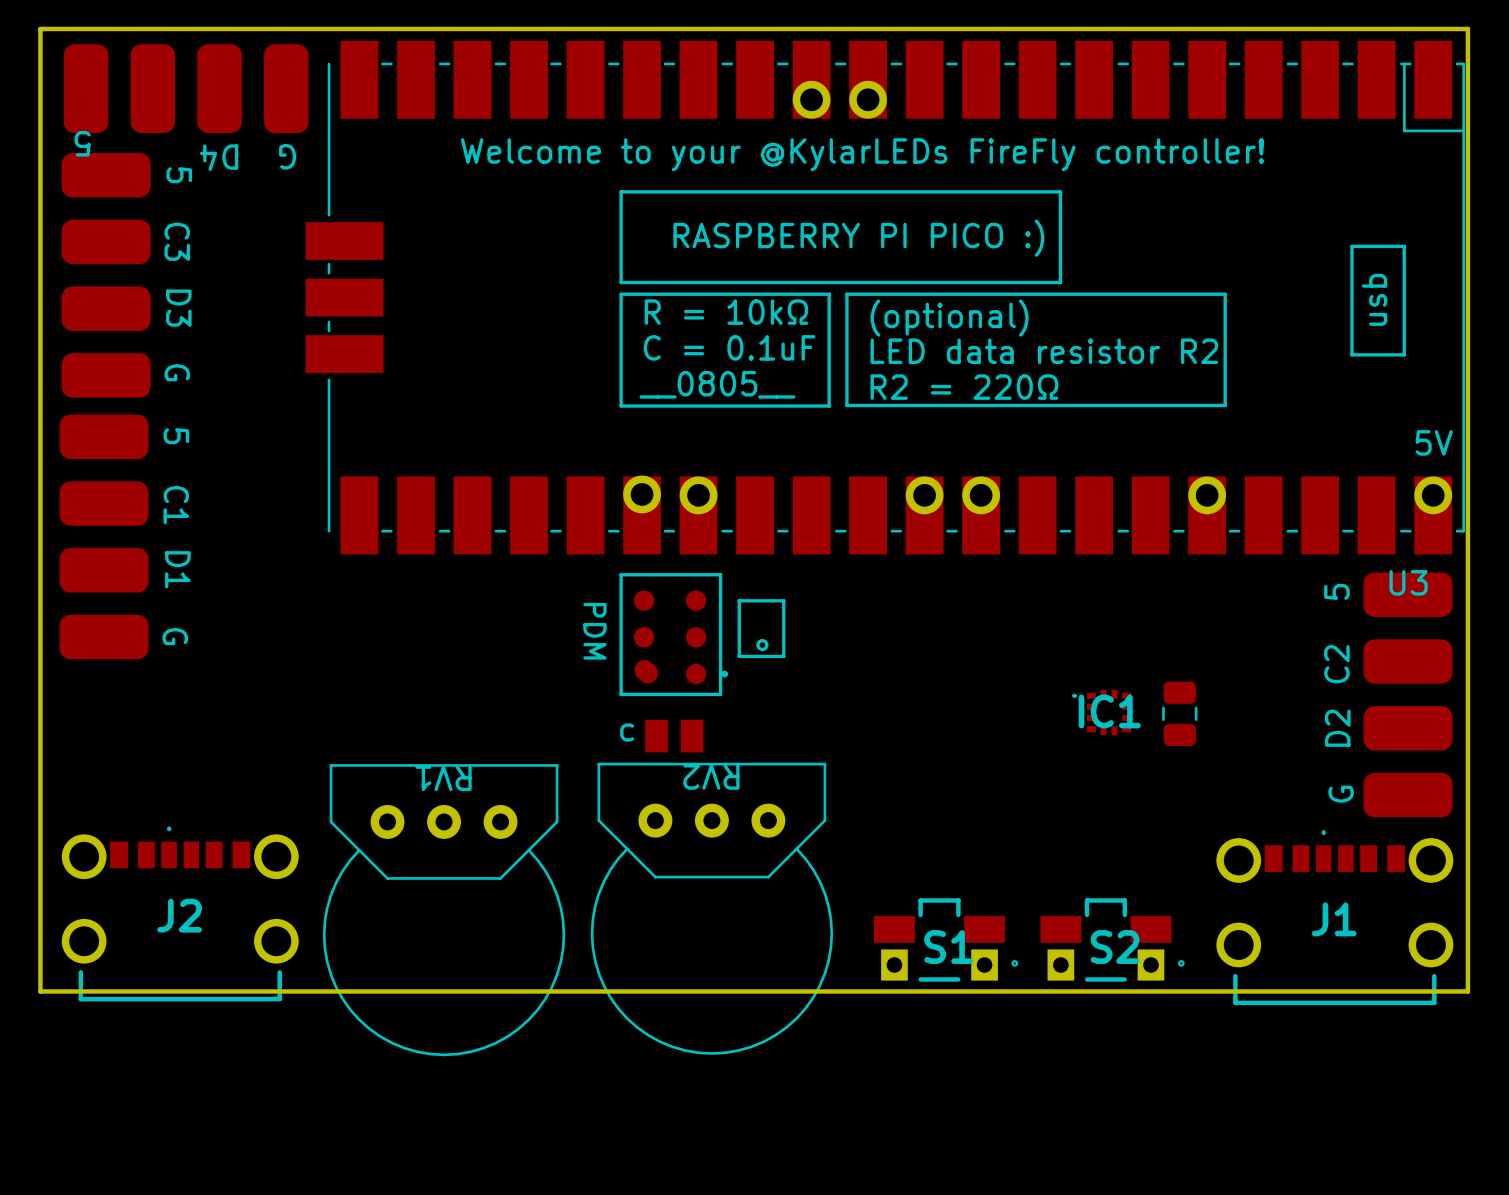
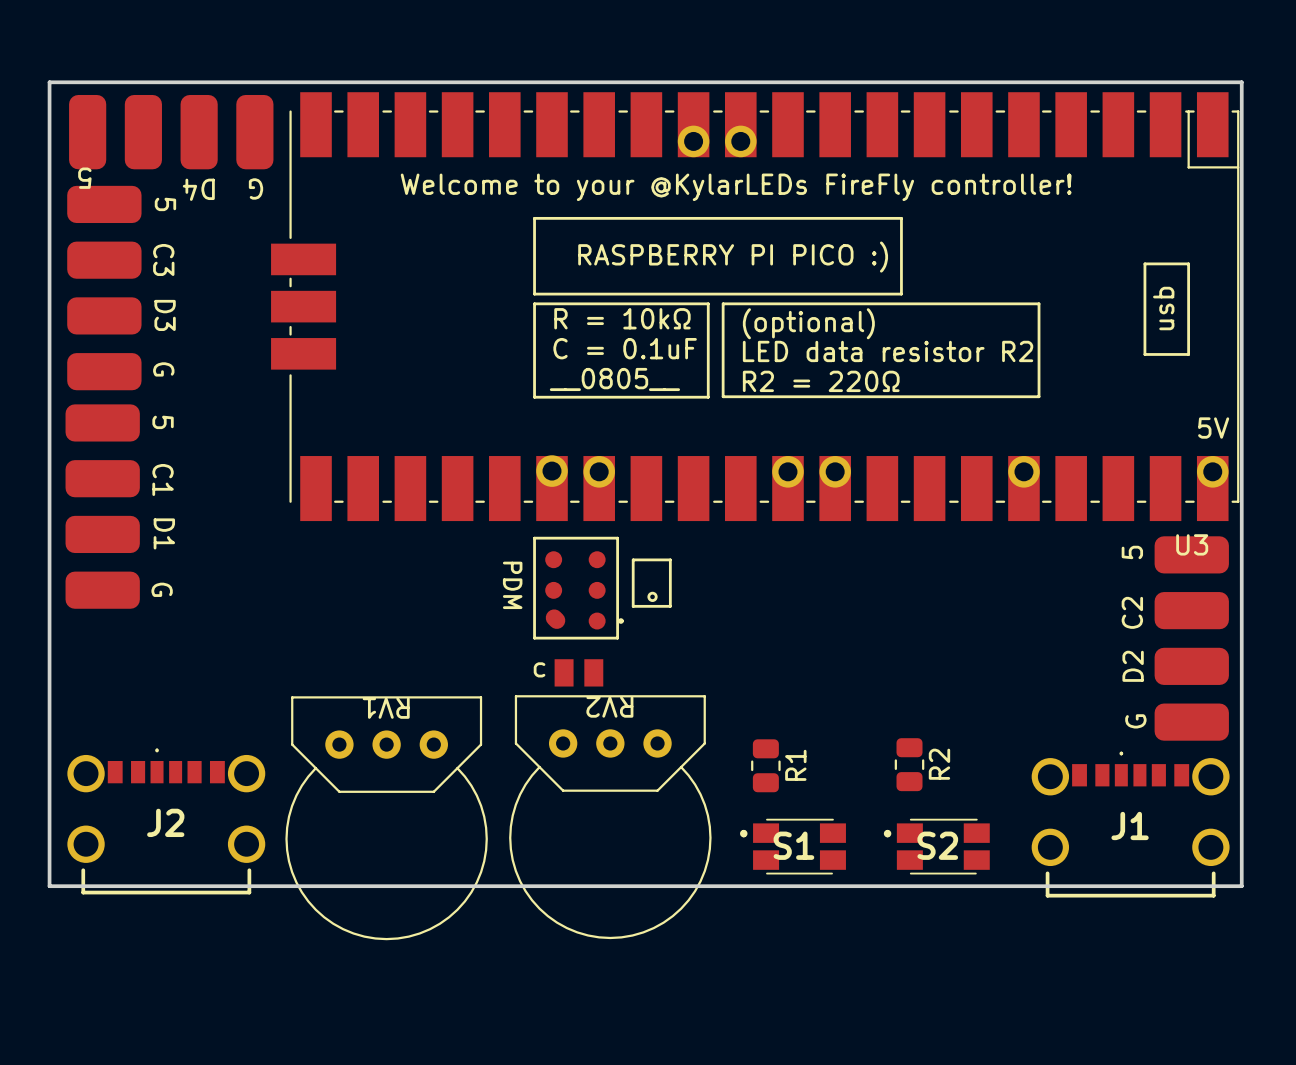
IC1: (1101, 712) -> none
part: (1179, 713) -> none
R2: none -> (909, 764)
R1: none -> (765, 765)
S1 footprint: [873, 898, 1019, 982] -> [740, 818, 846, 875]
S2 footprint: [1040, 898, 1185, 982] -> [883, 818, 990, 875]

